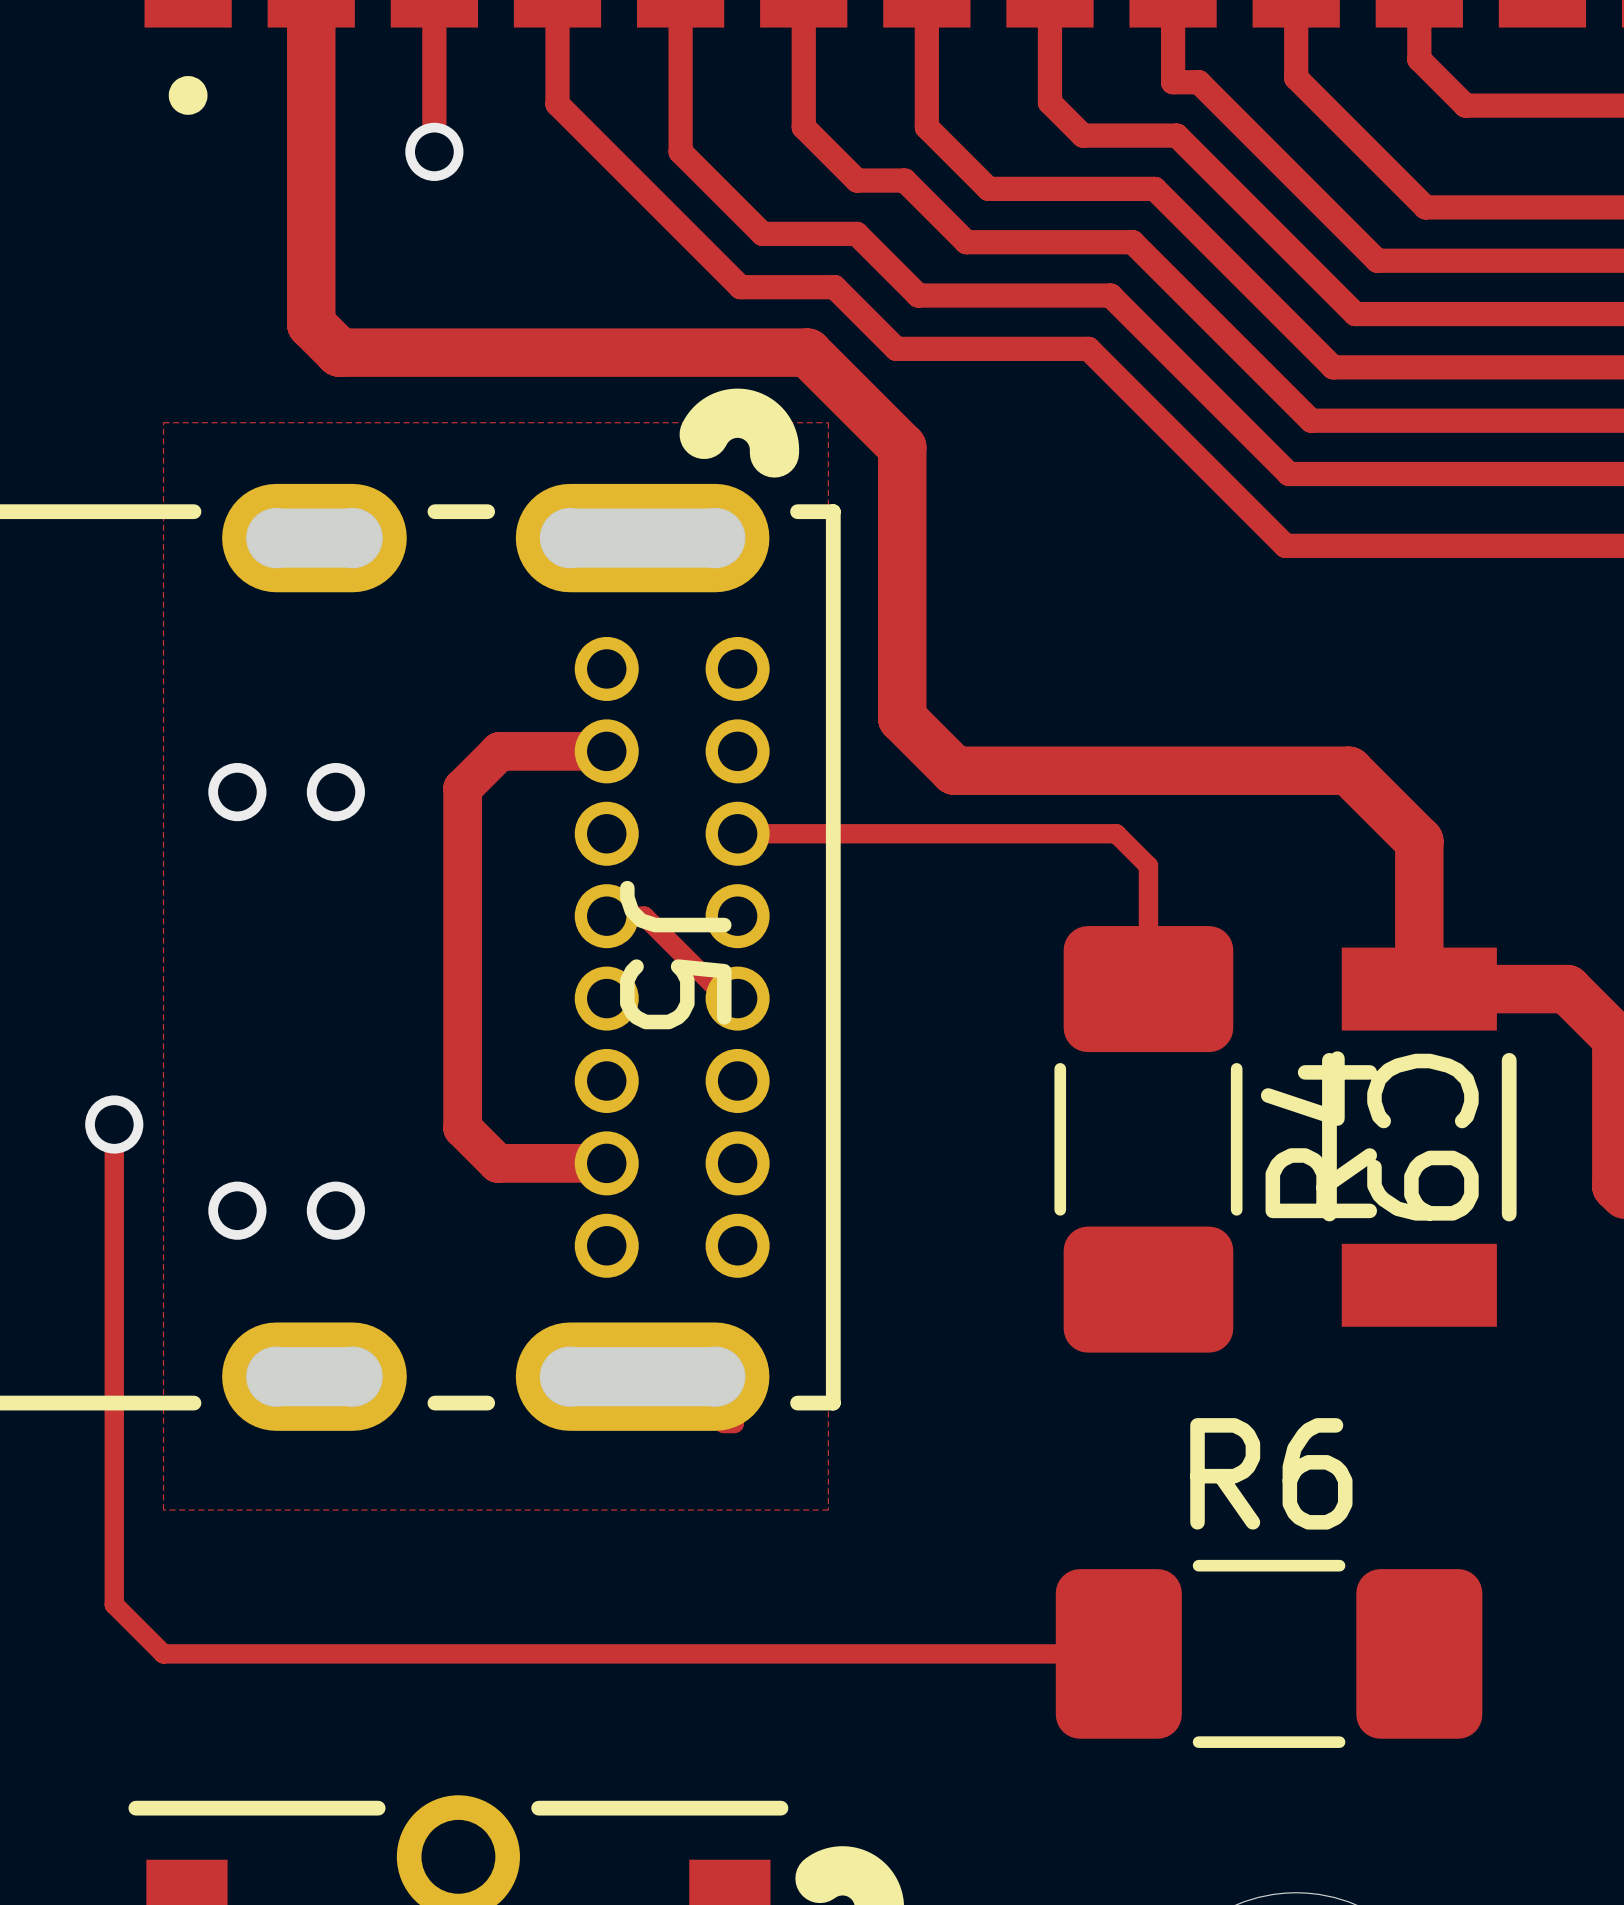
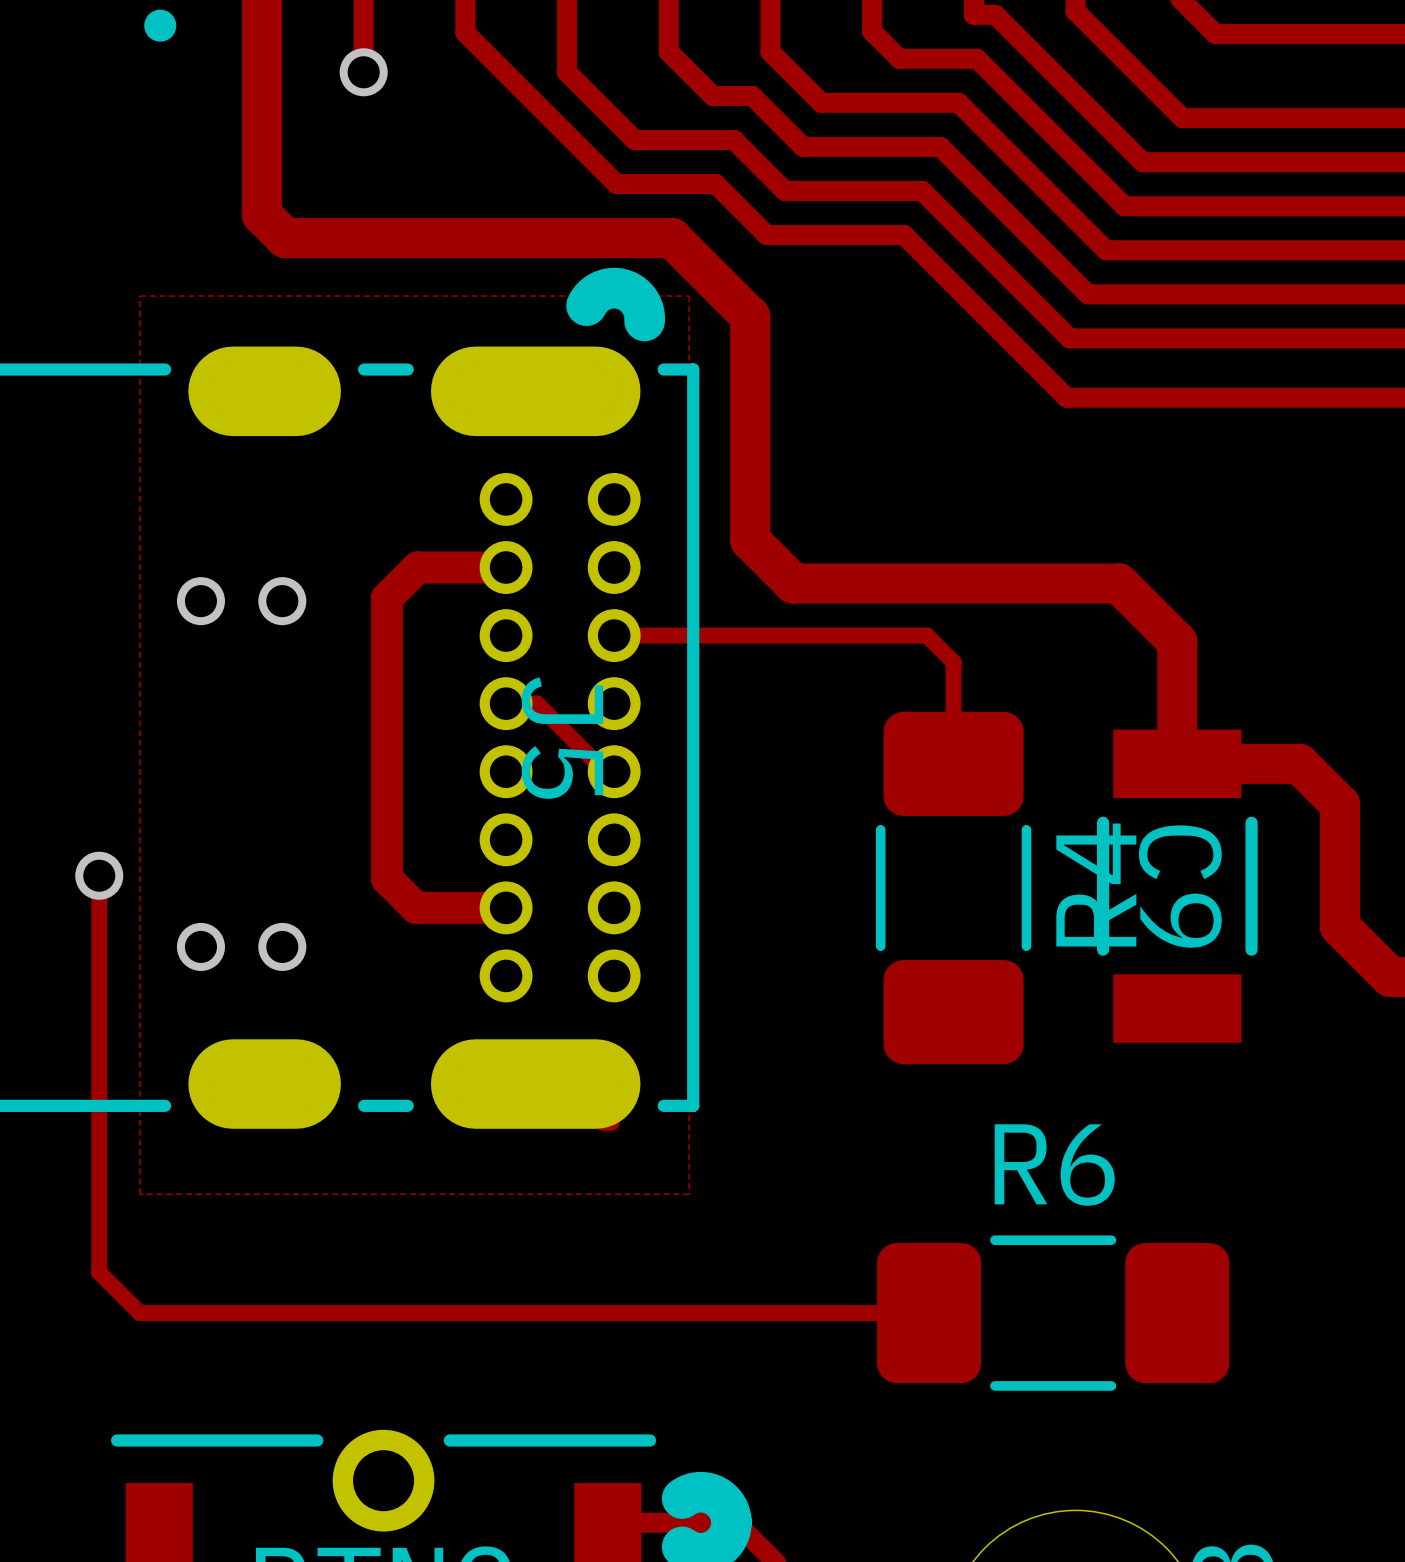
track: (856, 233) (918, 295) (944, 295) -> (712, 140) (734, 140) (784, 190)
track: (834, 287) (896, 348) (922, 348) -> (694, 184) (715, 184) (766, 235)

